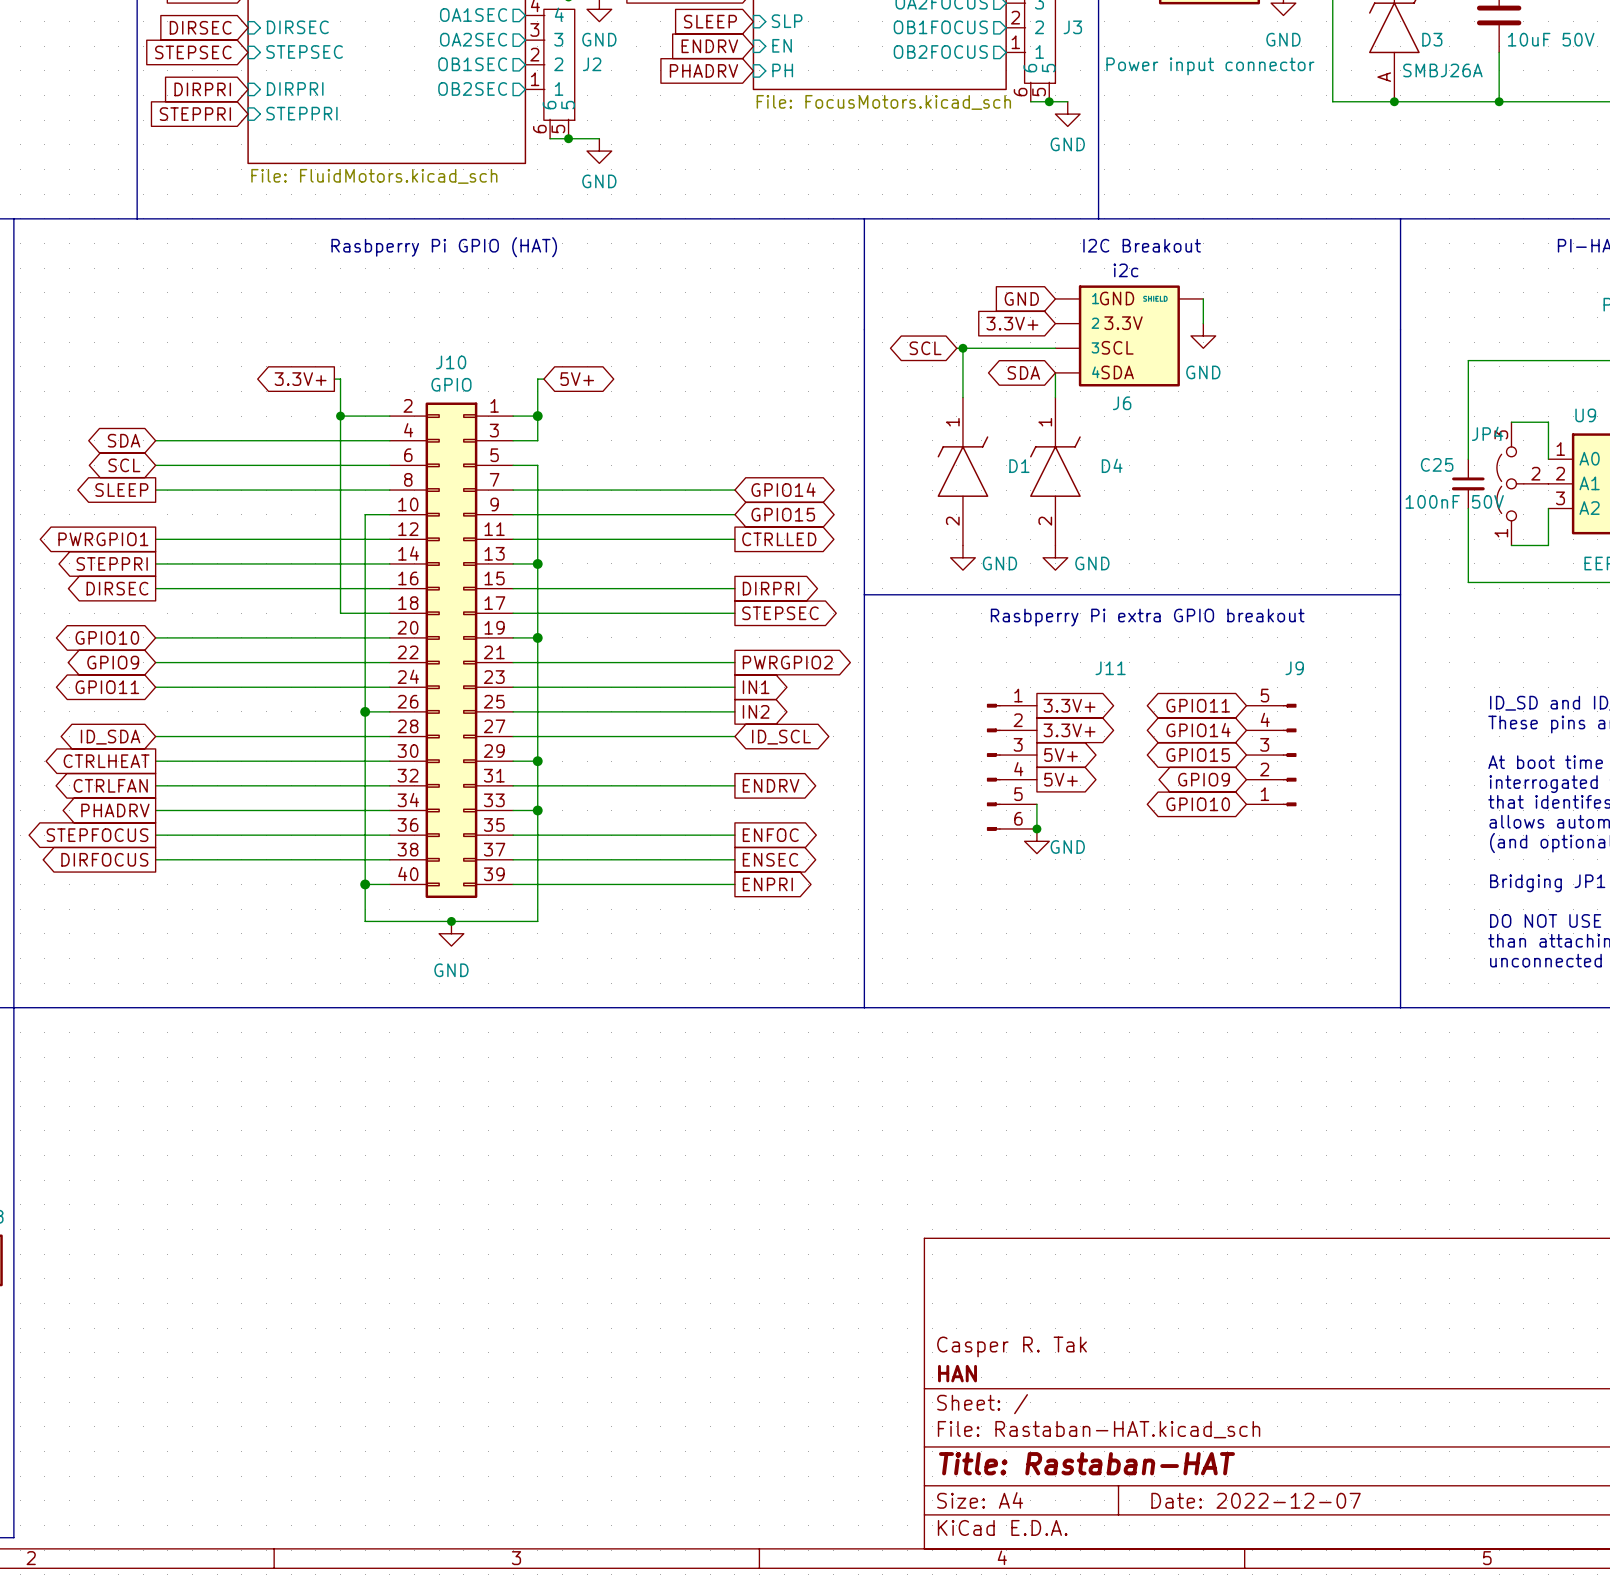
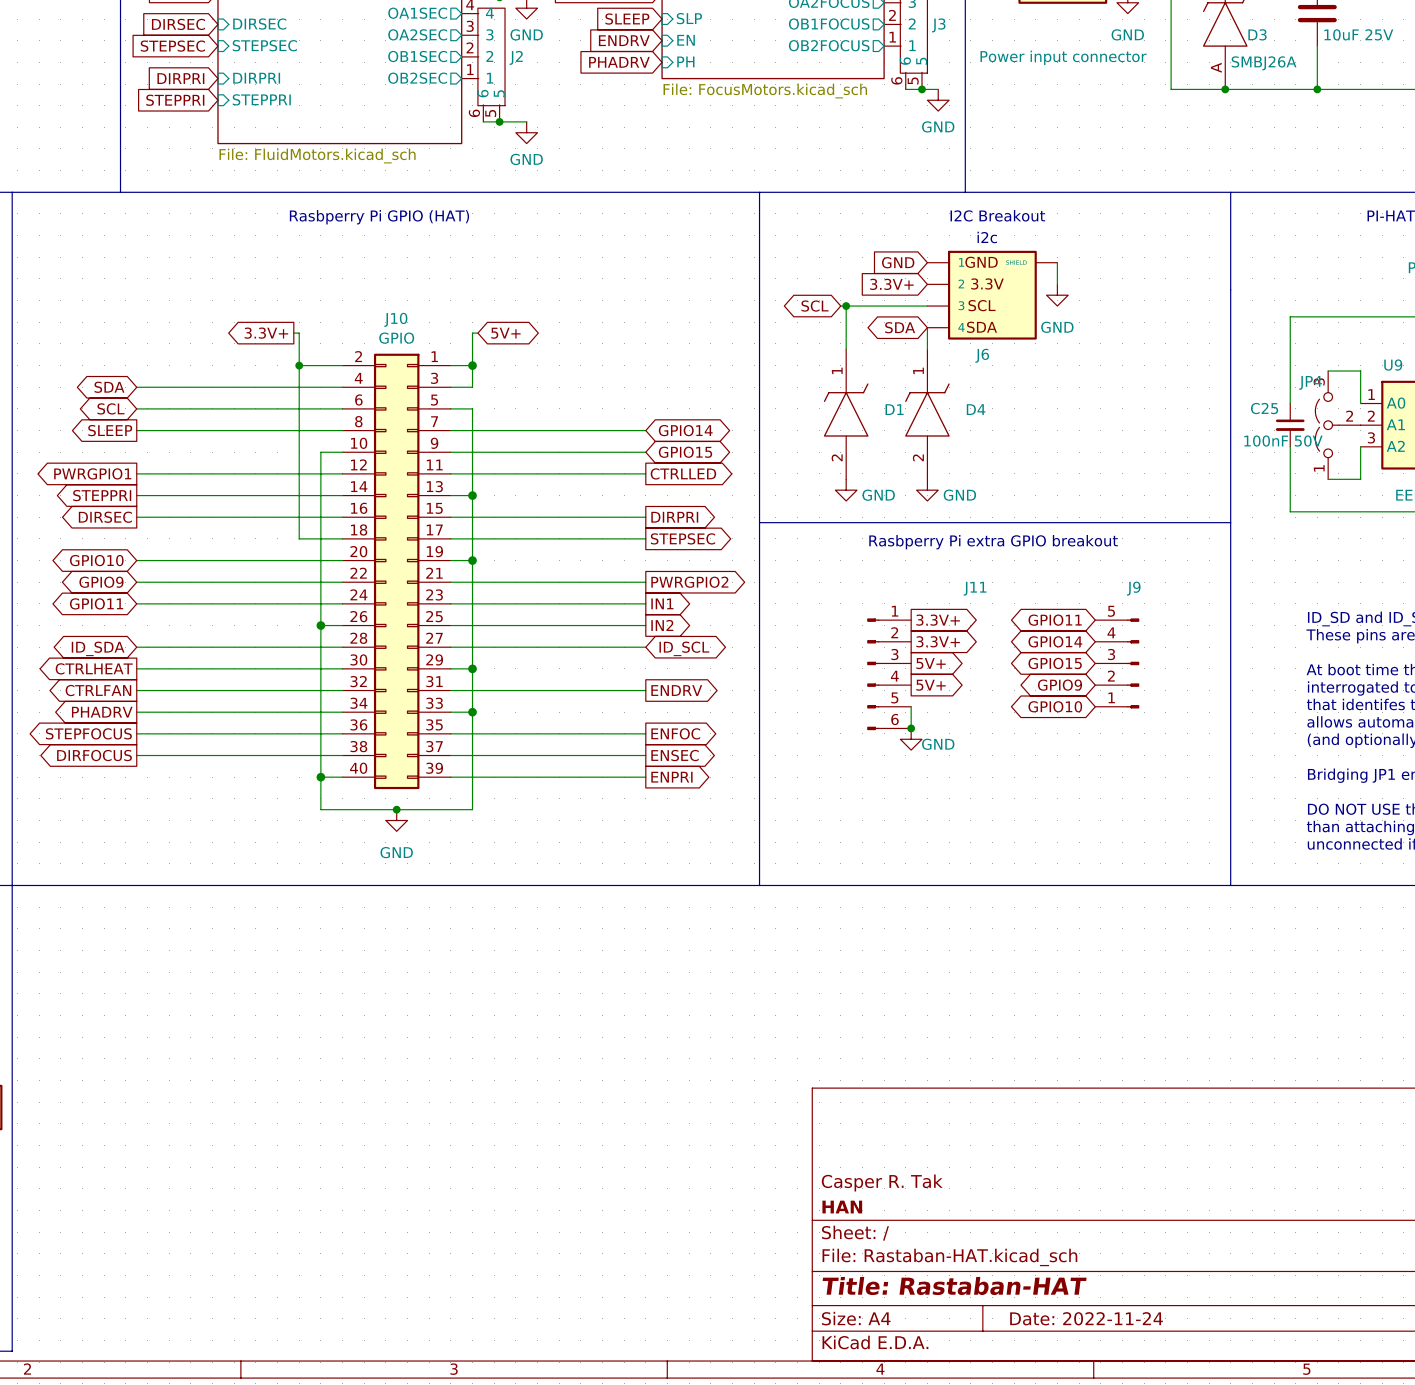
part value: 10uF 50V (1551, 39) -> 10uF 25V (1358, 34)
title block: Date: 2022-12-07 (1256, 1500) -> Date: 2022-11-24 (1086, 1318)

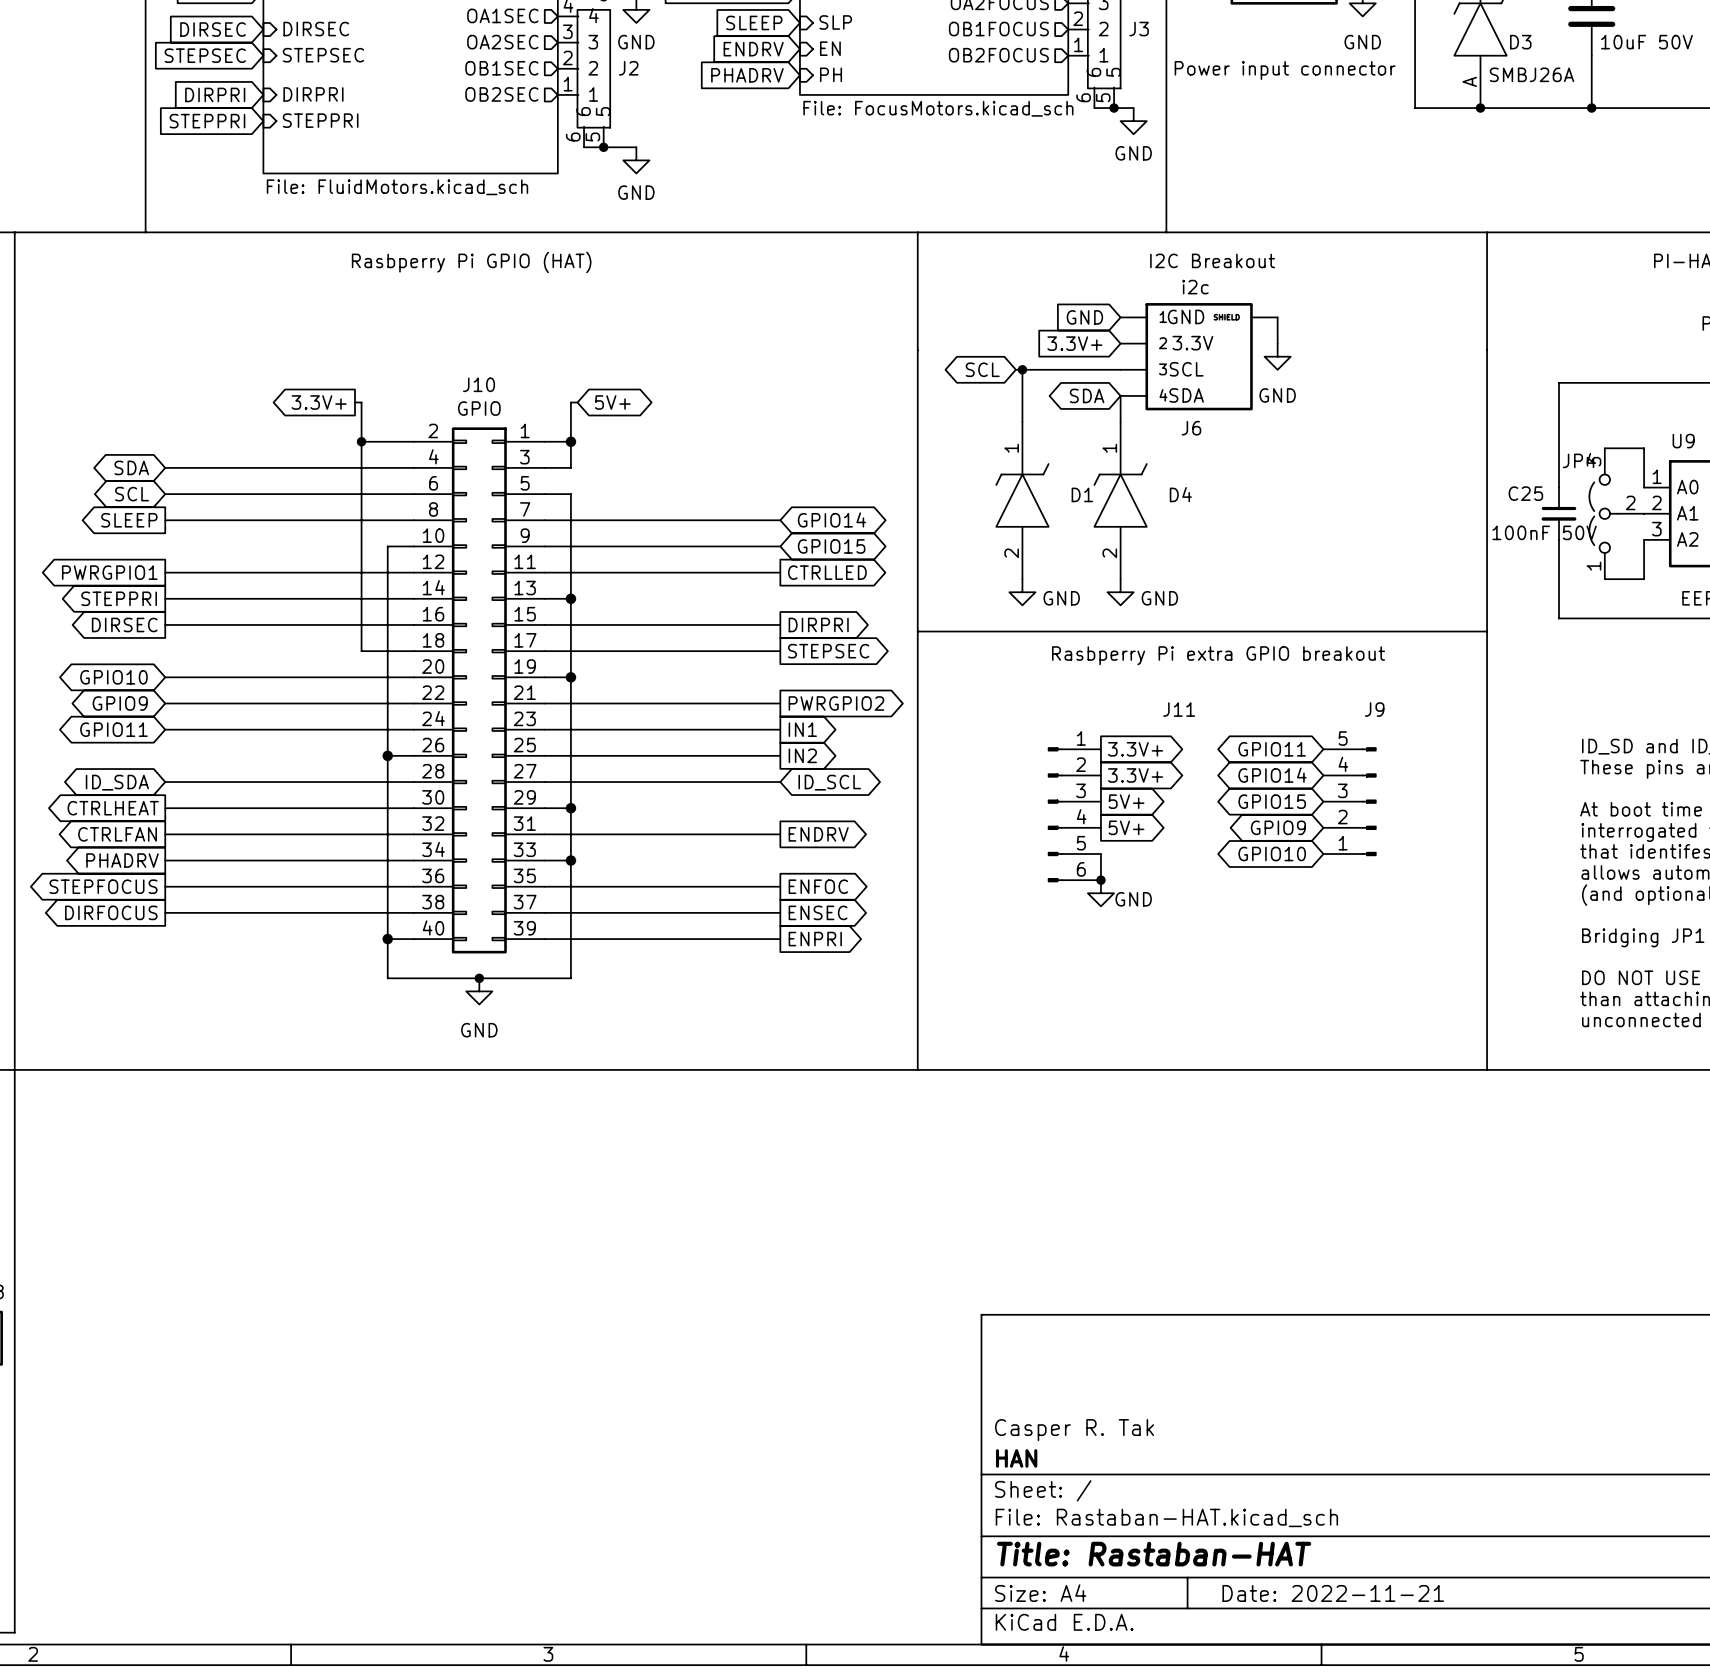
part value: 10uF 25V (1358, 34) -> 10uF 50V (1646, 42)
title block: Date: 2022-11-24 (1086, 1318) -> Date: 2022-11-21 (1333, 1593)

